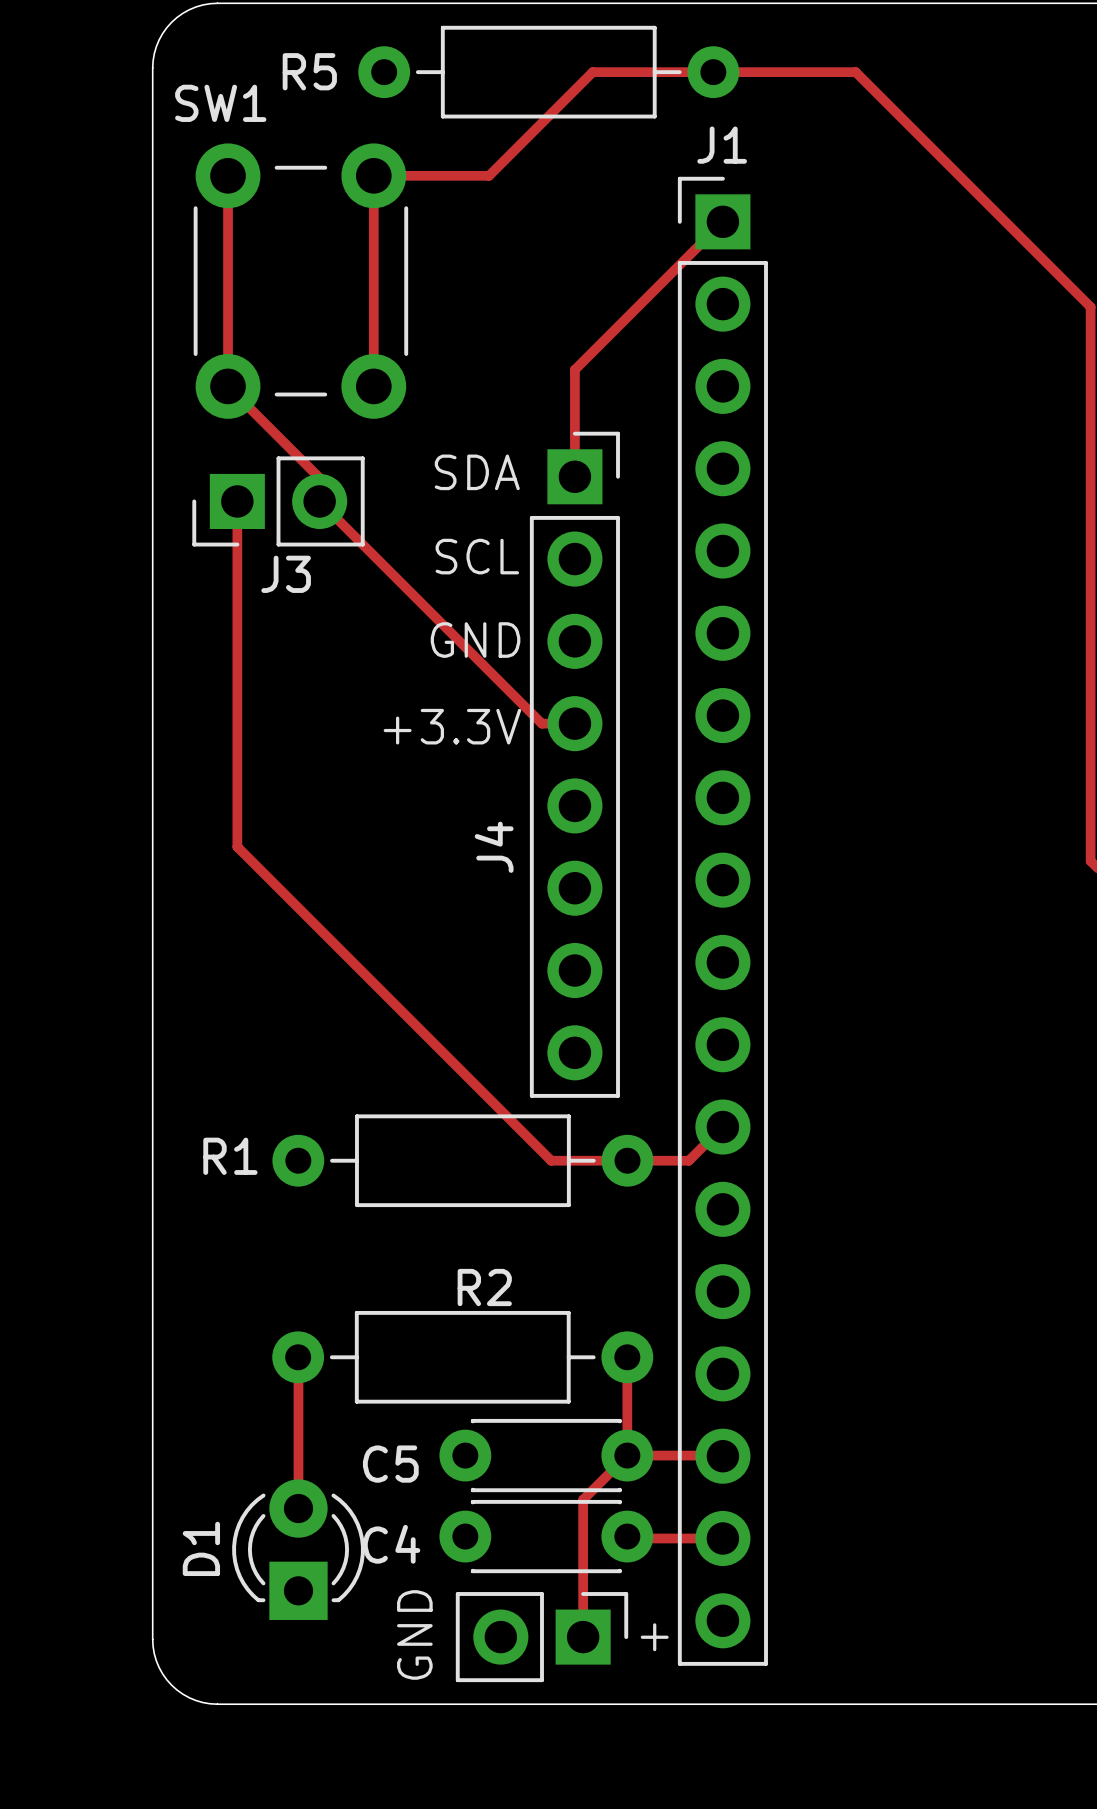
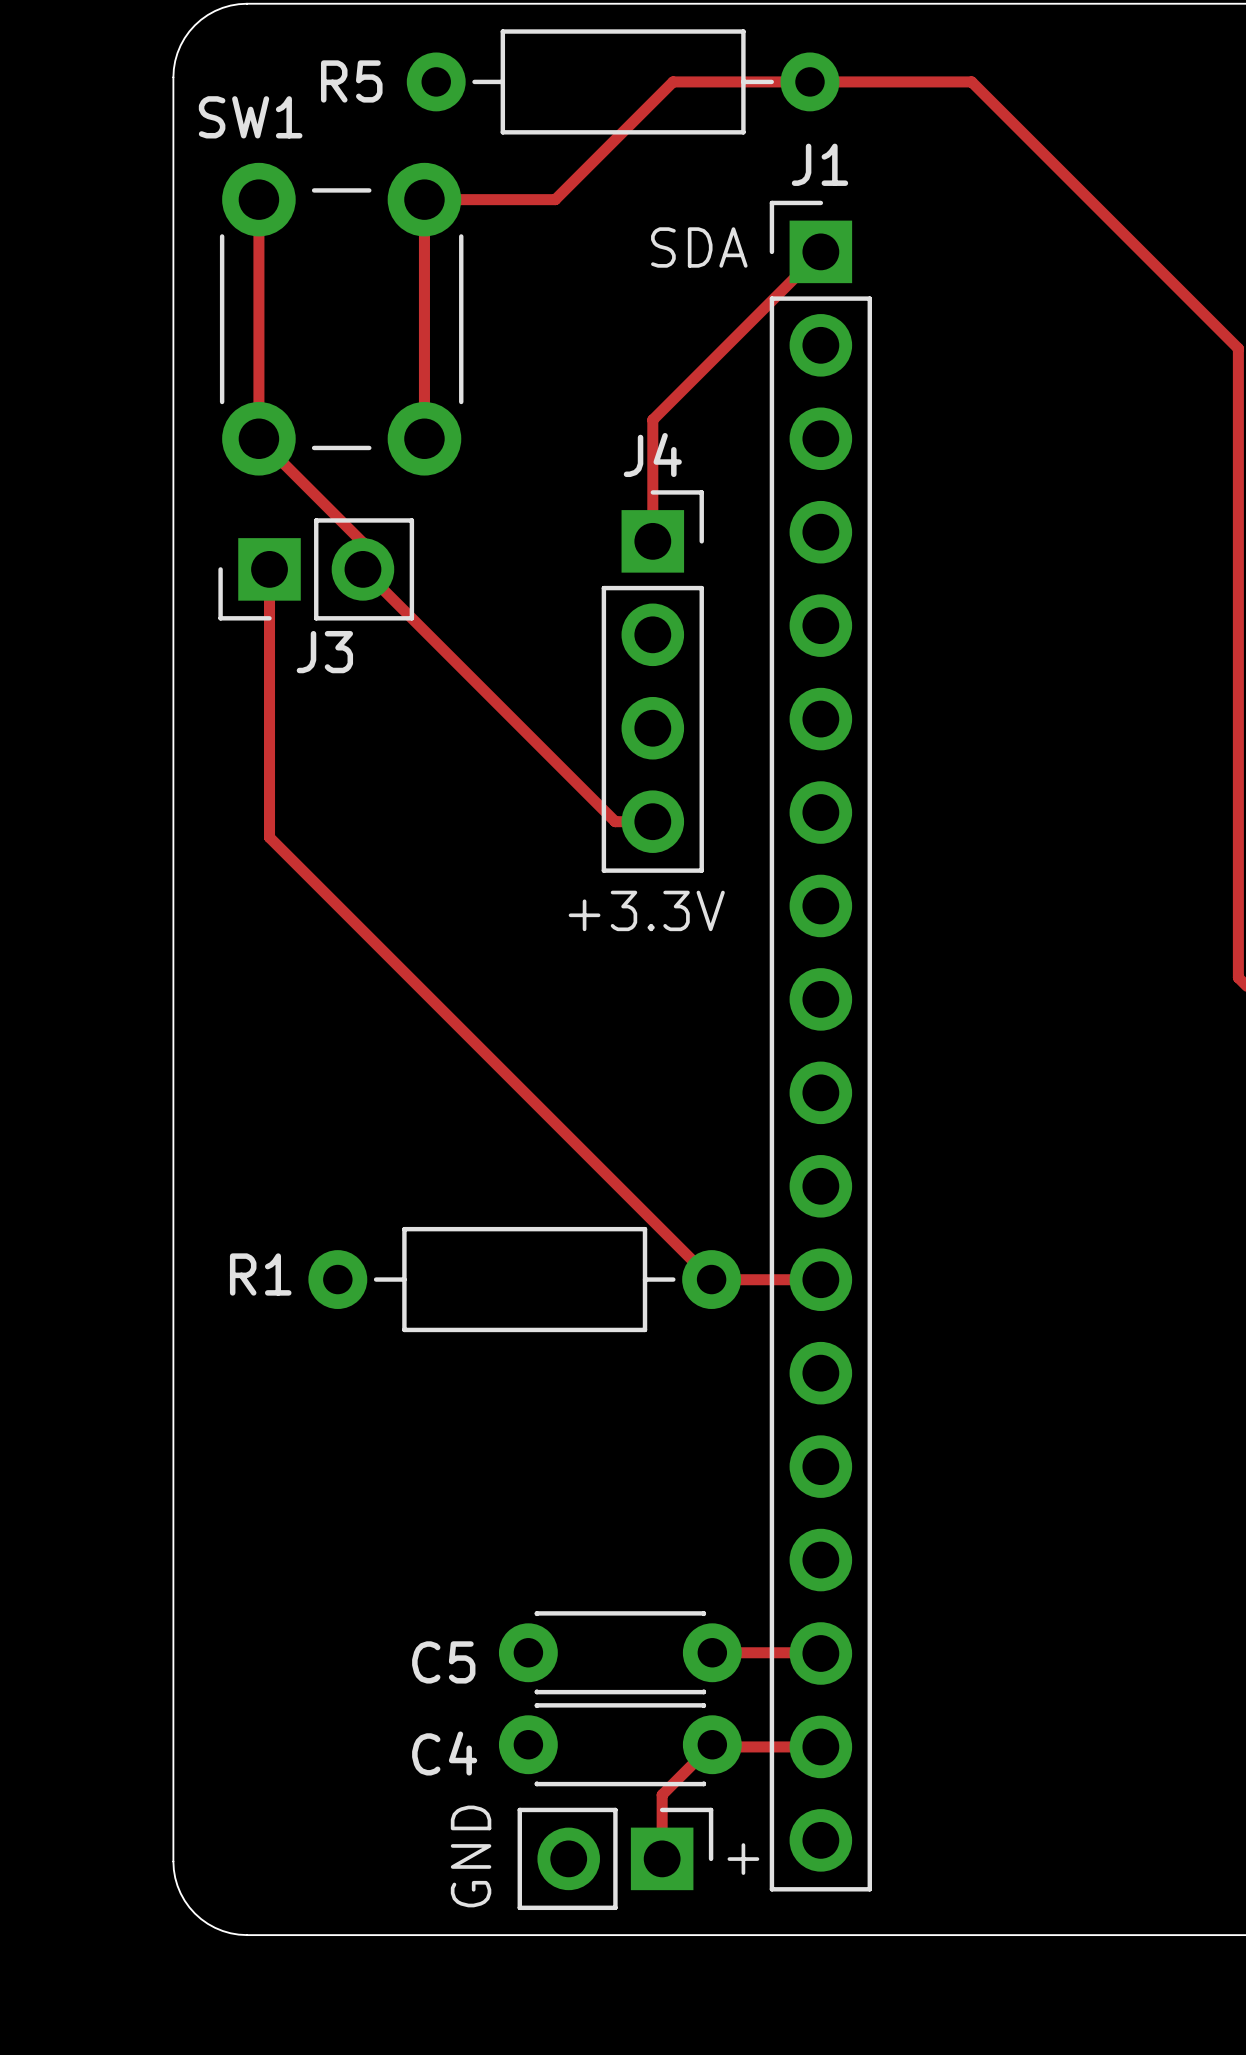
J4 footprint: [529, 431, 620, 1098] -> [601, 490, 704, 873]
text position: SDA (477, 472) -> SDA (699, 247)
text: SCL (477, 556) -> none
text: GND (475, 640) -> none
text position: +3.3V (452, 726) -> +3.3V (646, 910)
track: (237, 737) (237, 846) (551, 1160) (688, 1160) (722, 1127) -> (269, 837) (711, 1279) (820, 1279)
J4 name position: J4 (494, 847) -> J4 (652, 455)
R1 position: (462, 1160) -> (524, 1279)
track: (298, 1357) (298, 1508) -> none
R2: (462, 1357) -> none
track: (627, 1357) (627, 1455) (583, 1499) (583, 1580) -> (712, 1744) (662, 1794)
D1: (298, 1549) -> none

